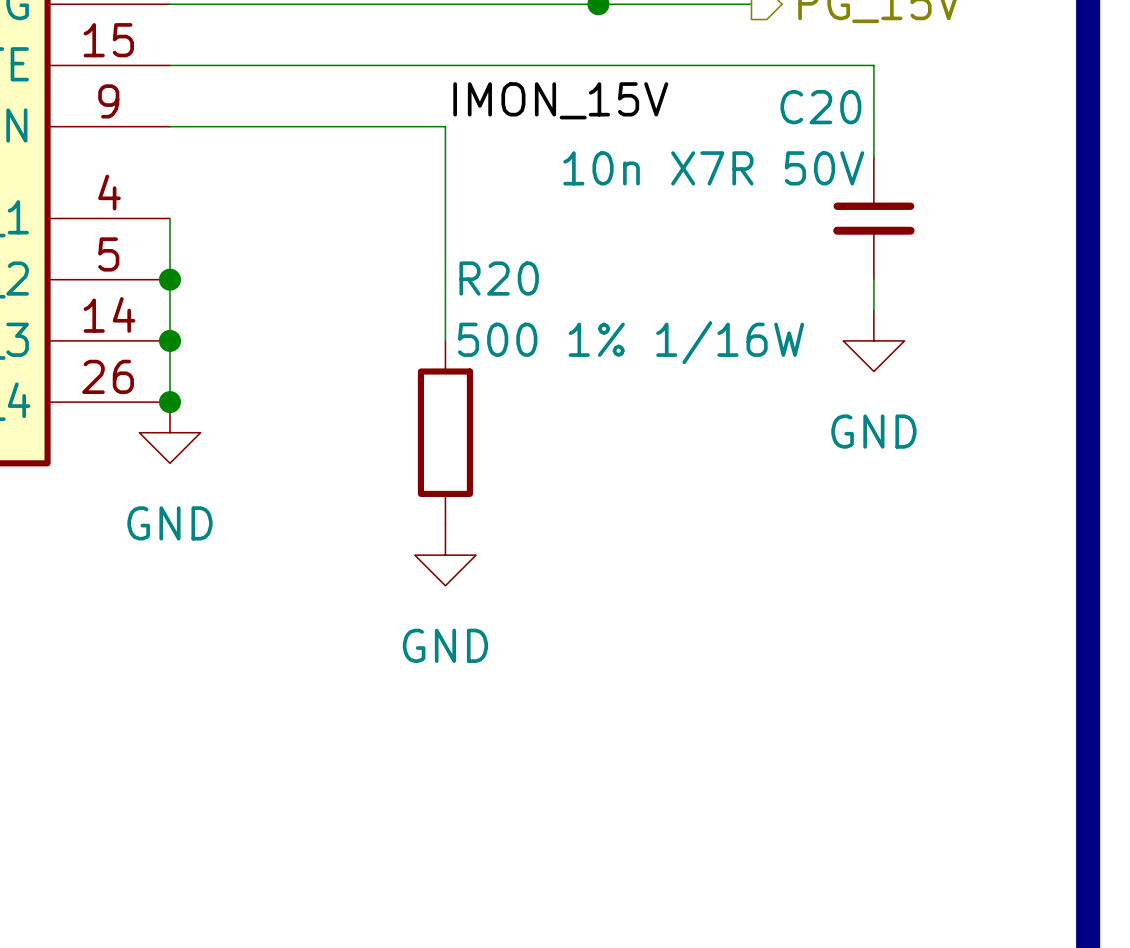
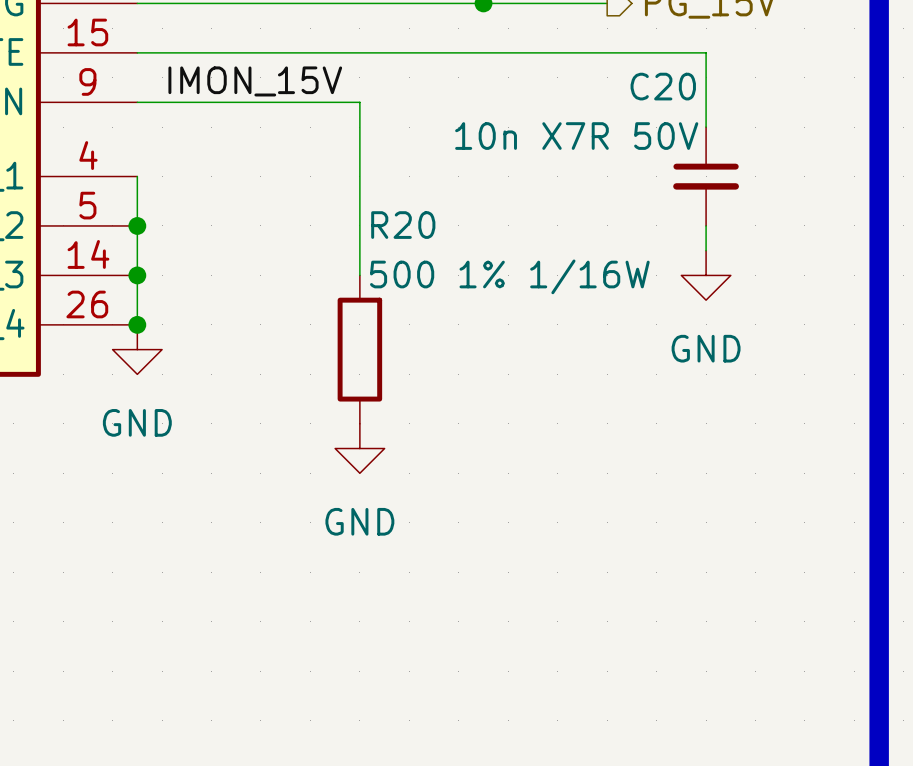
label position: IMON_15V (560, 100) -> IMON_15V (255, 81)

